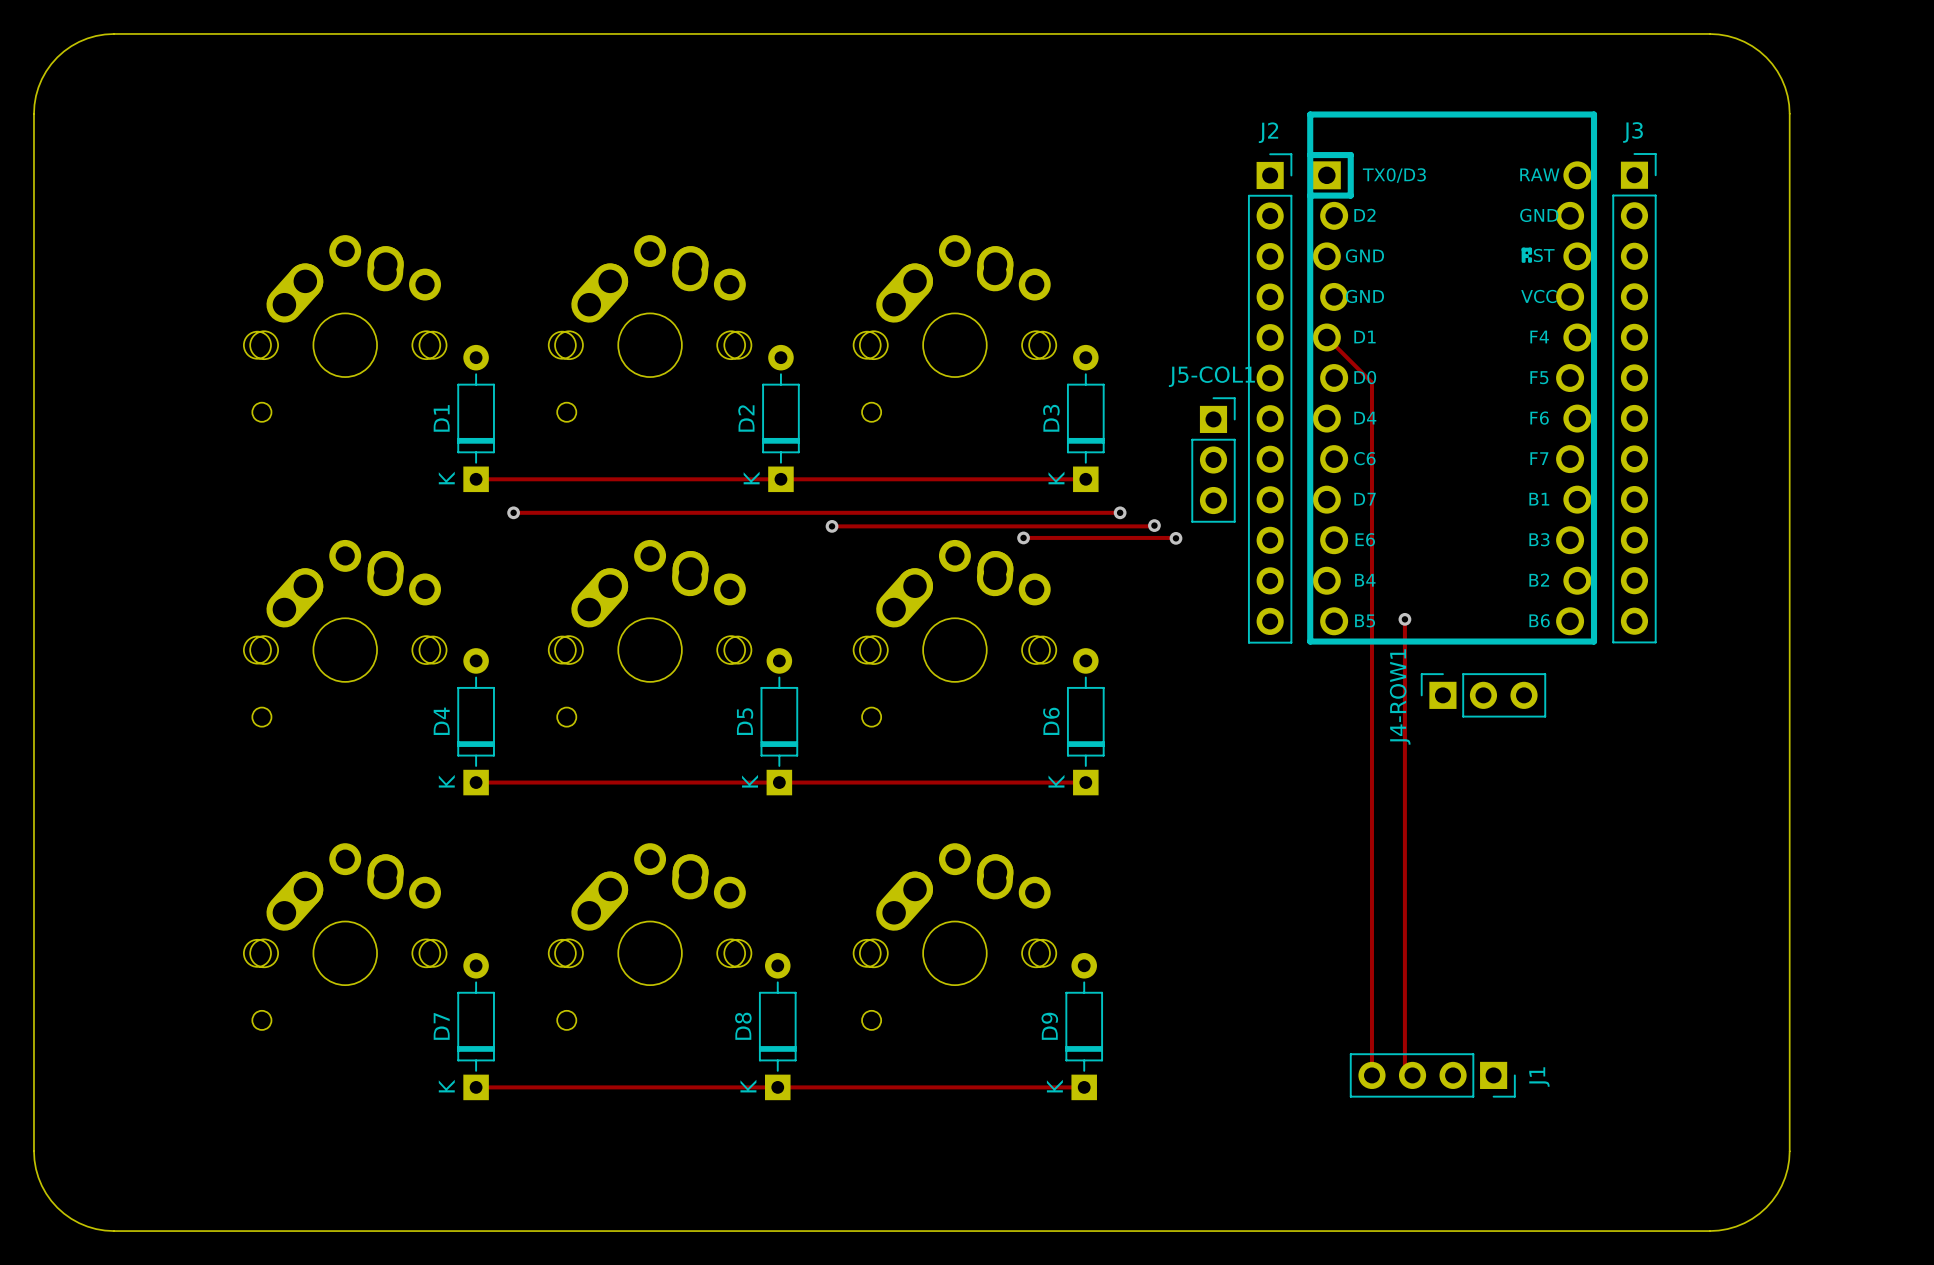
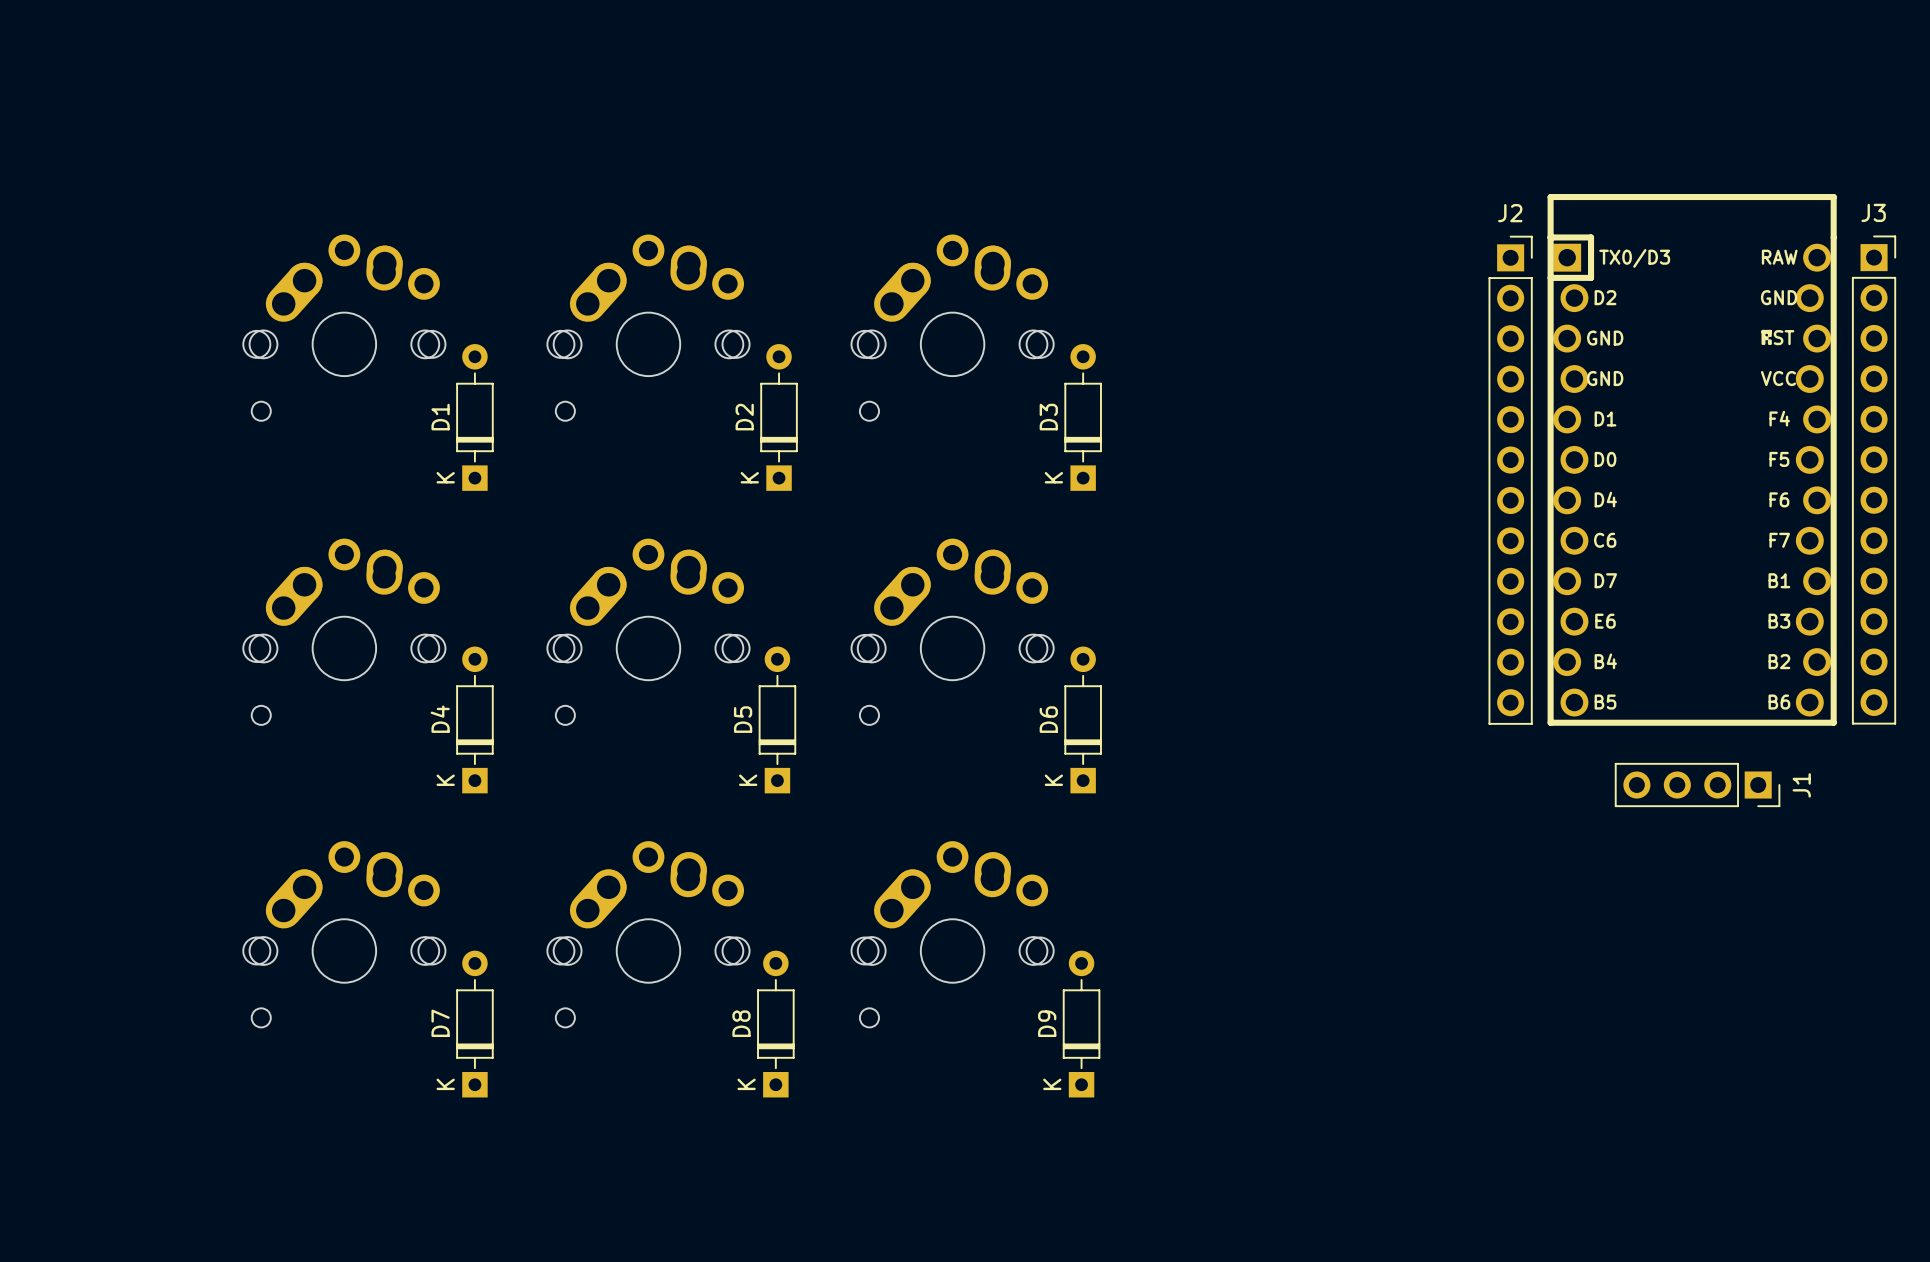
board edge: (113, 33) (1709, 33) (1736, 38) (1752, 46) (1766, 57) (1781, 79) (1787, 96) (1789, 113) (1789, 1151) (1785, 1177) (1777, 1193) (1766, 1207) (1752, 1218) (1727, 1229) (1709, 1231) (113, 1231) (96, 1229) (71, 1218) (57, 1207) (46, 1193) (35, 1169) (33, 1151) (33, 113) (38, 87) (46, 71) (57, 57) (79, 41) (96, 35) (113, 33) -> none
track: (1326, 337) (1371, 382) (1371, 1075) -> none
part position: (1452, 378) -> (1692, 459)
J2 position: (1270, 398) -> (1510, 480)
J3 position: (1634, 398) -> (1874, 480)
J5-COL1: (1213, 459) -> none
track: (476, 479) (1085, 479) -> none
track: (513, 512) (1120, 512) -> none
via: (513, 512) -> none
via: (1120, 512) -> none
track: (1154, 525) (832, 526) -> none
via: (1154, 525) -> none
via: (832, 526) -> none
track: (1023, 537) (1175, 538) -> none
via: (1023, 537) -> none
via: (1175, 538) -> none
track: (1404, 619) (1404, 1067) (1412, 1075) -> none
via: (1404, 619) -> none
J4-ROW1: (1483, 695) -> none
track: (476, 782) (1085, 782) -> none
J1 position: (1432, 1075) -> (1697, 785)
track: (476, 1087) (1084, 1087) -> none

